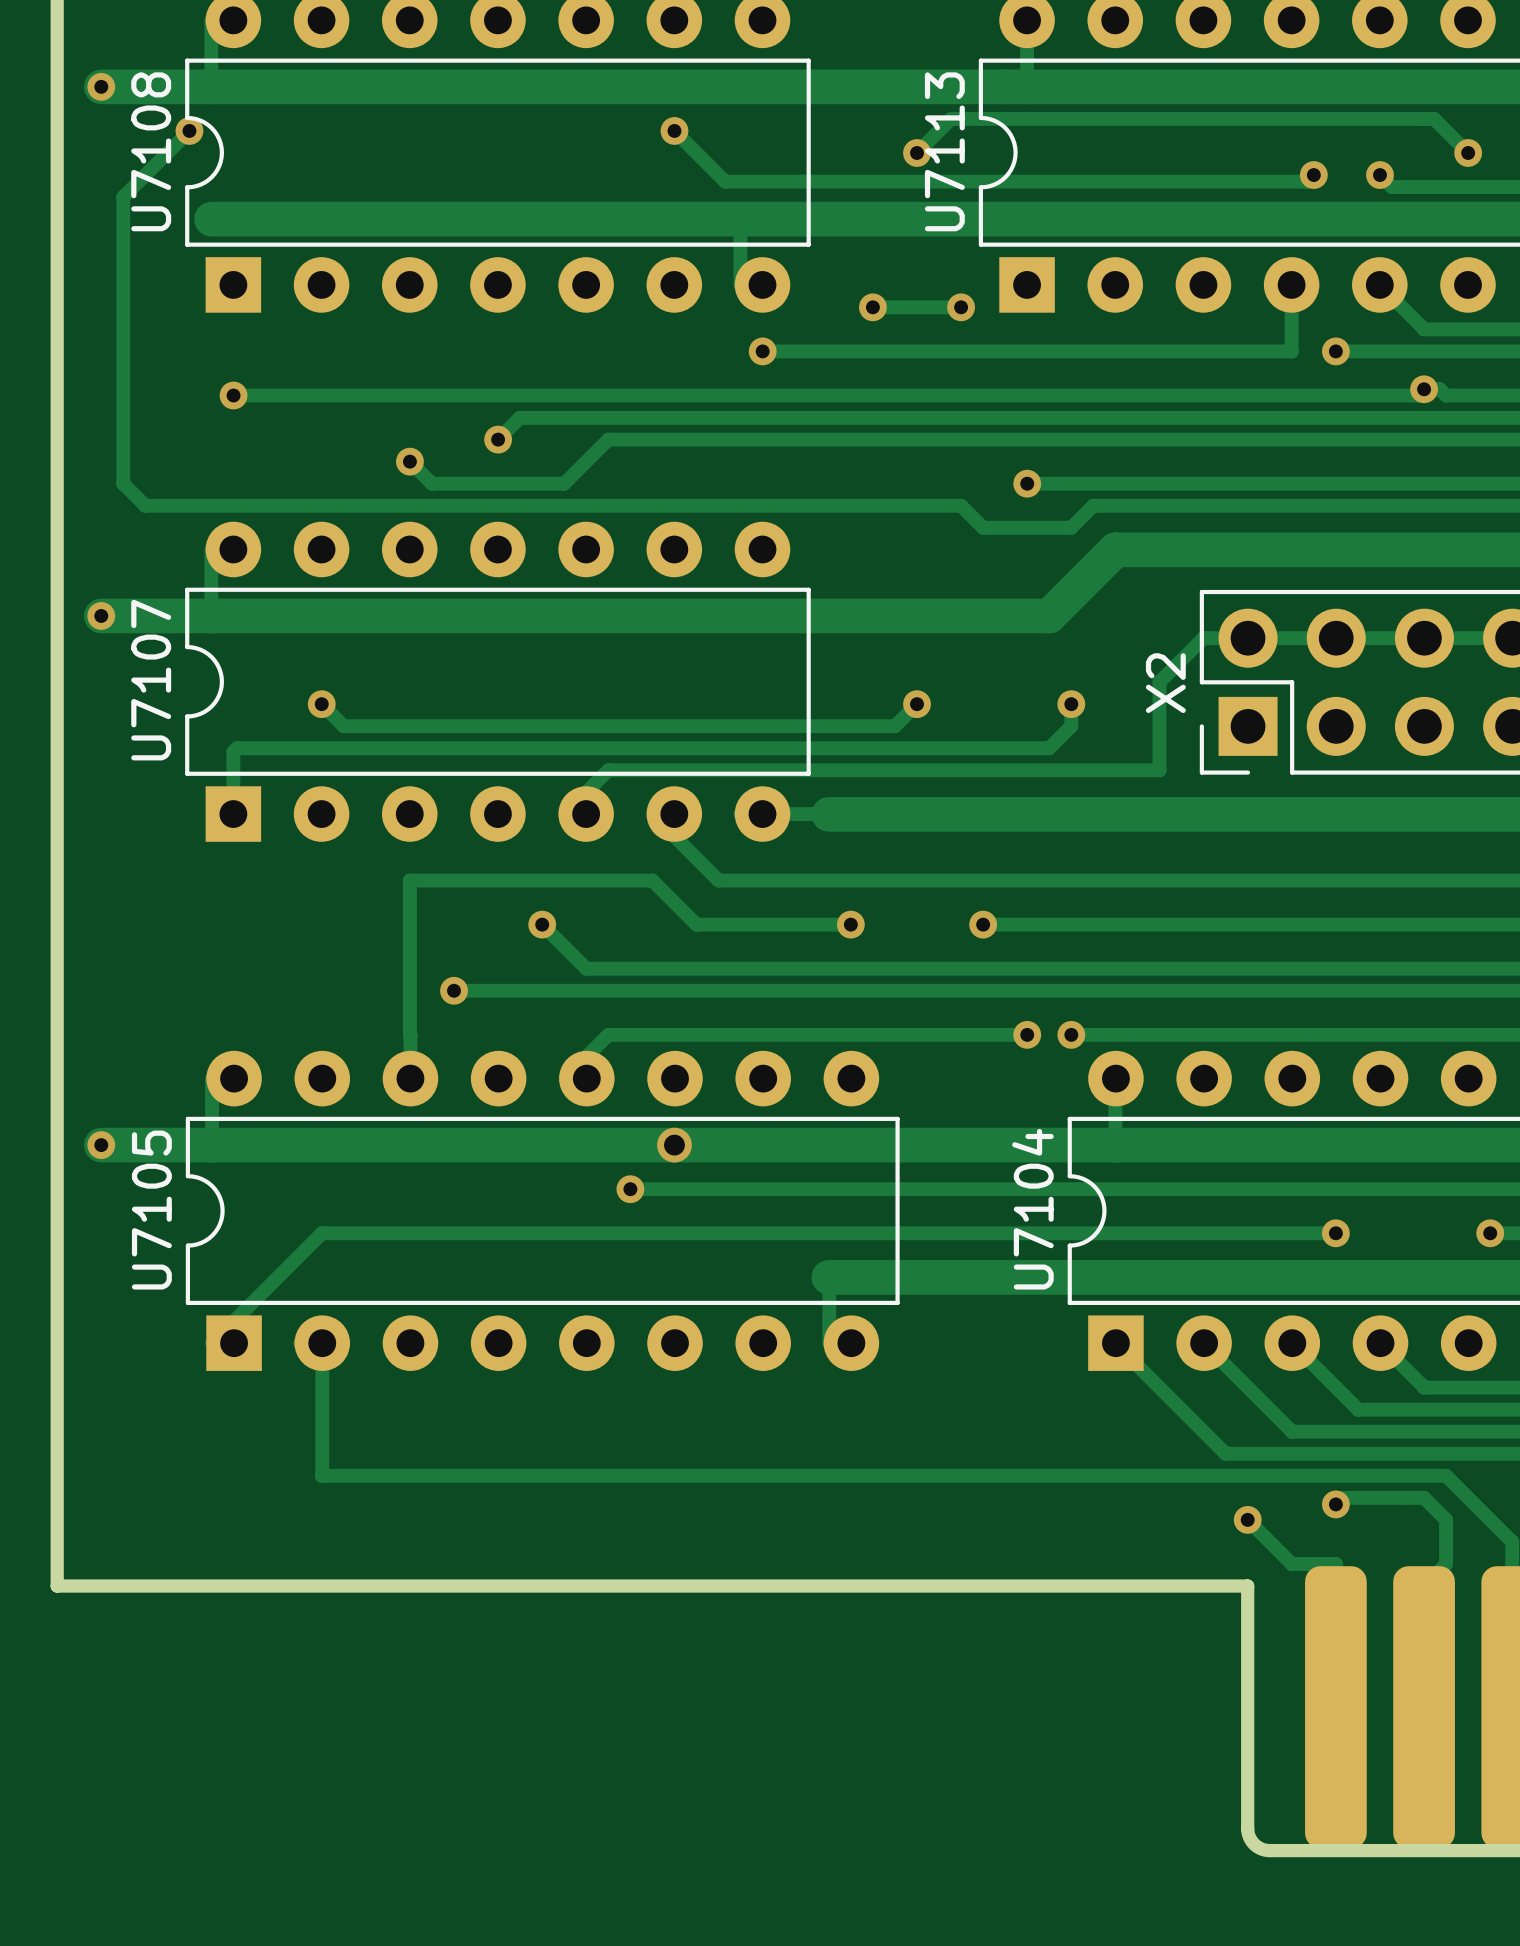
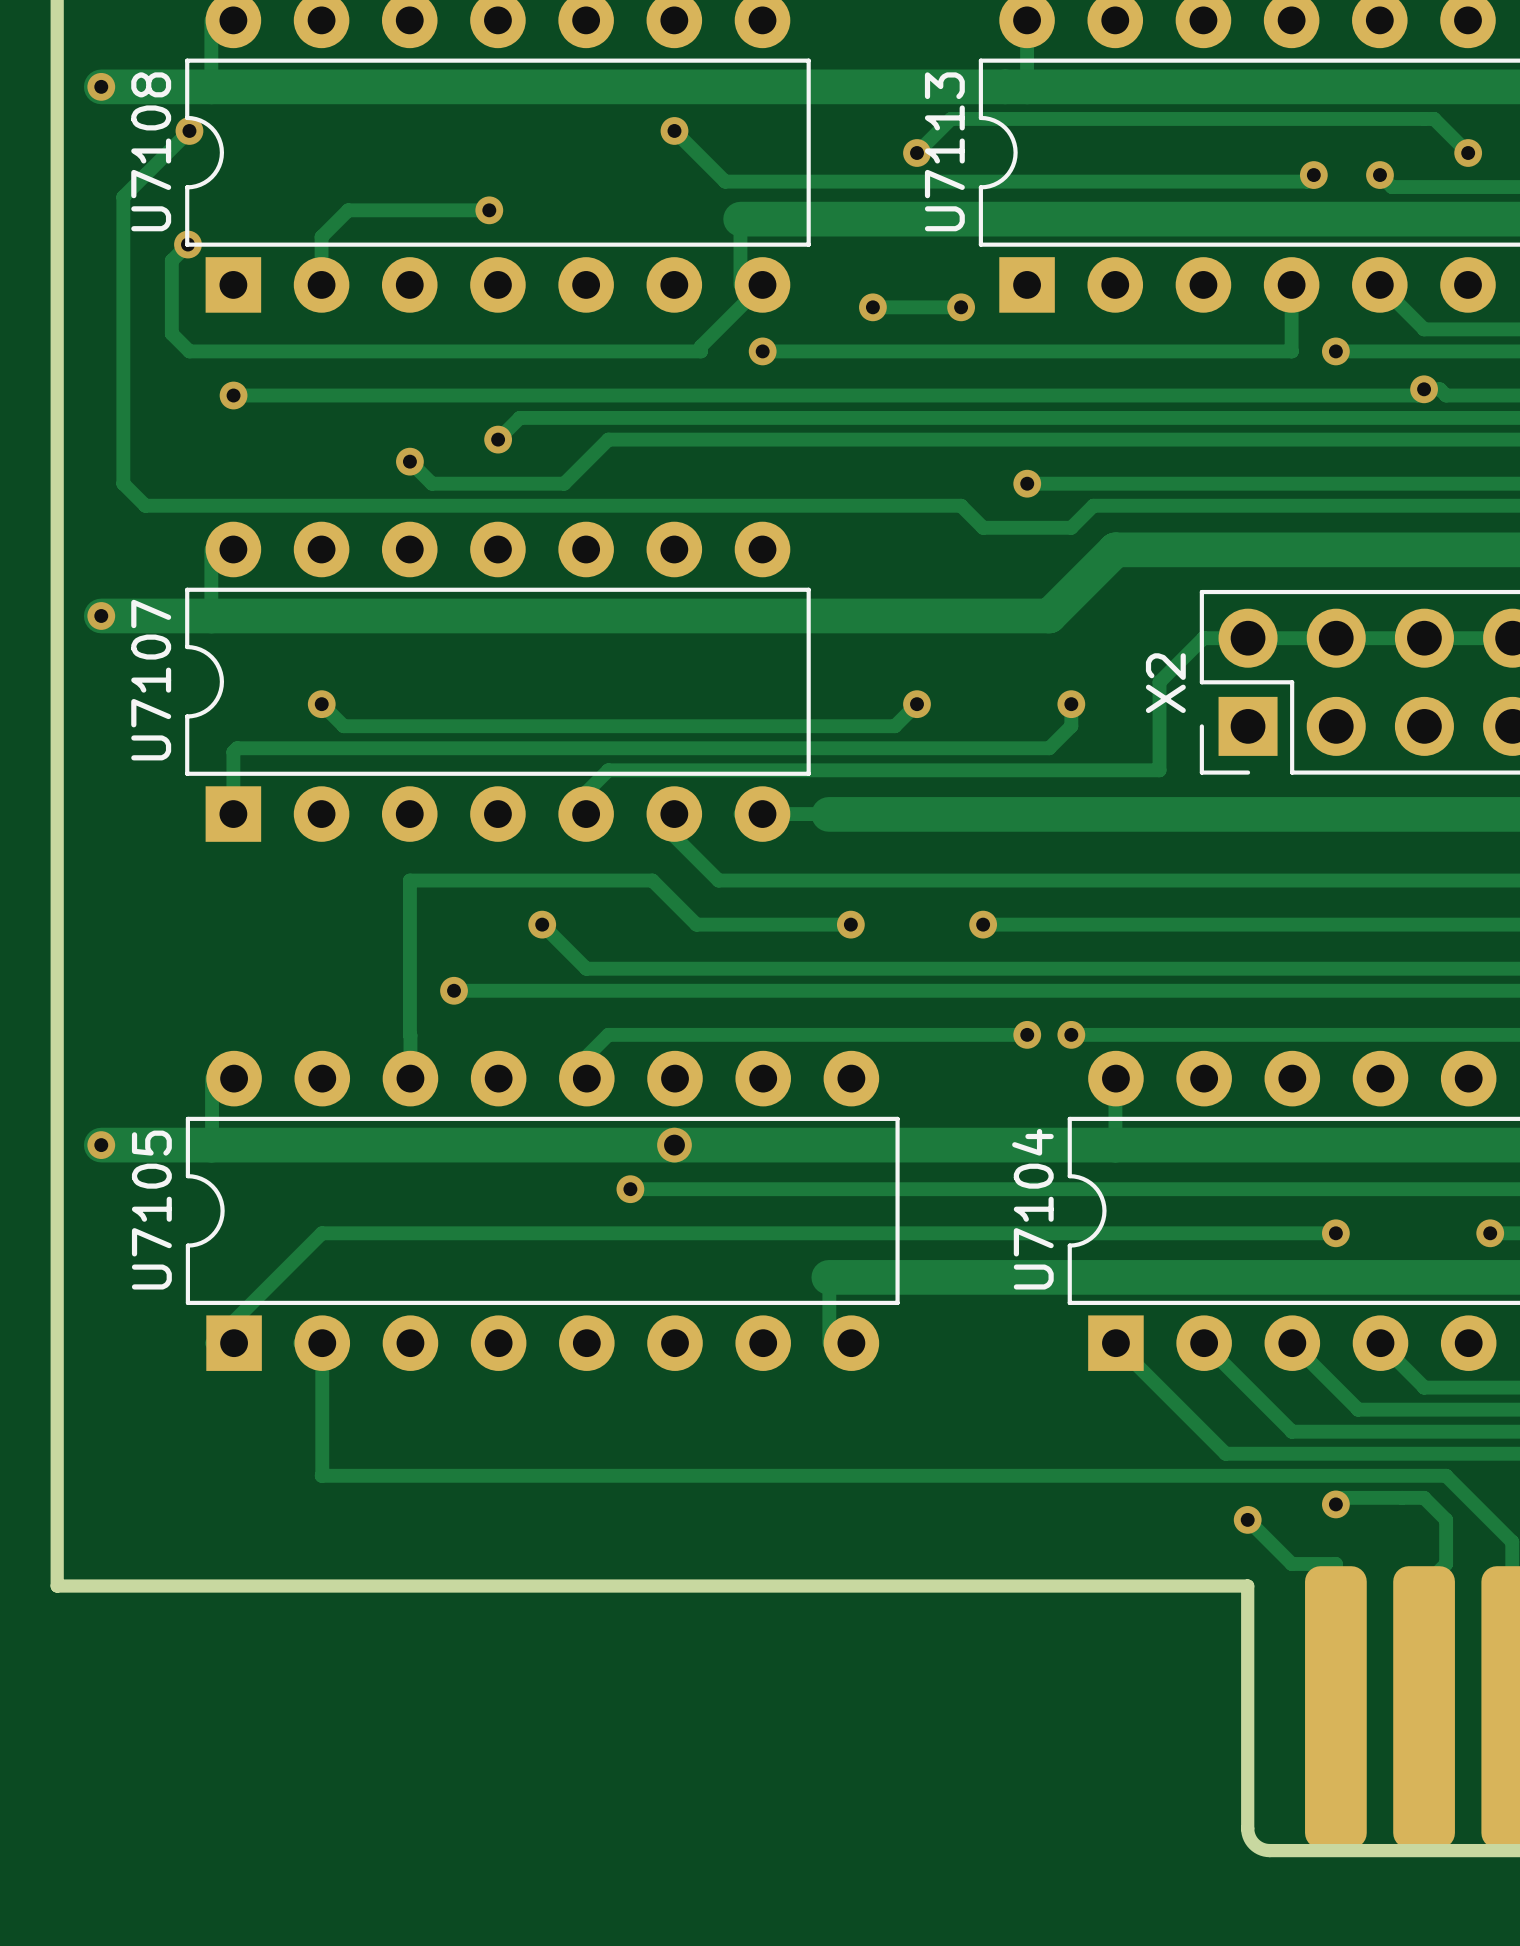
track: none -> (489, 210) (348, 210) (321, 236) (321, 284)
via: none -> (489, 210)
track: (211, 219) (740, 219) -> none
track: none -> (187, 244) (171, 260) (171, 333) (189, 351) (700, 351) (700, 346) (762, 284)
via: none -> (187, 244)

